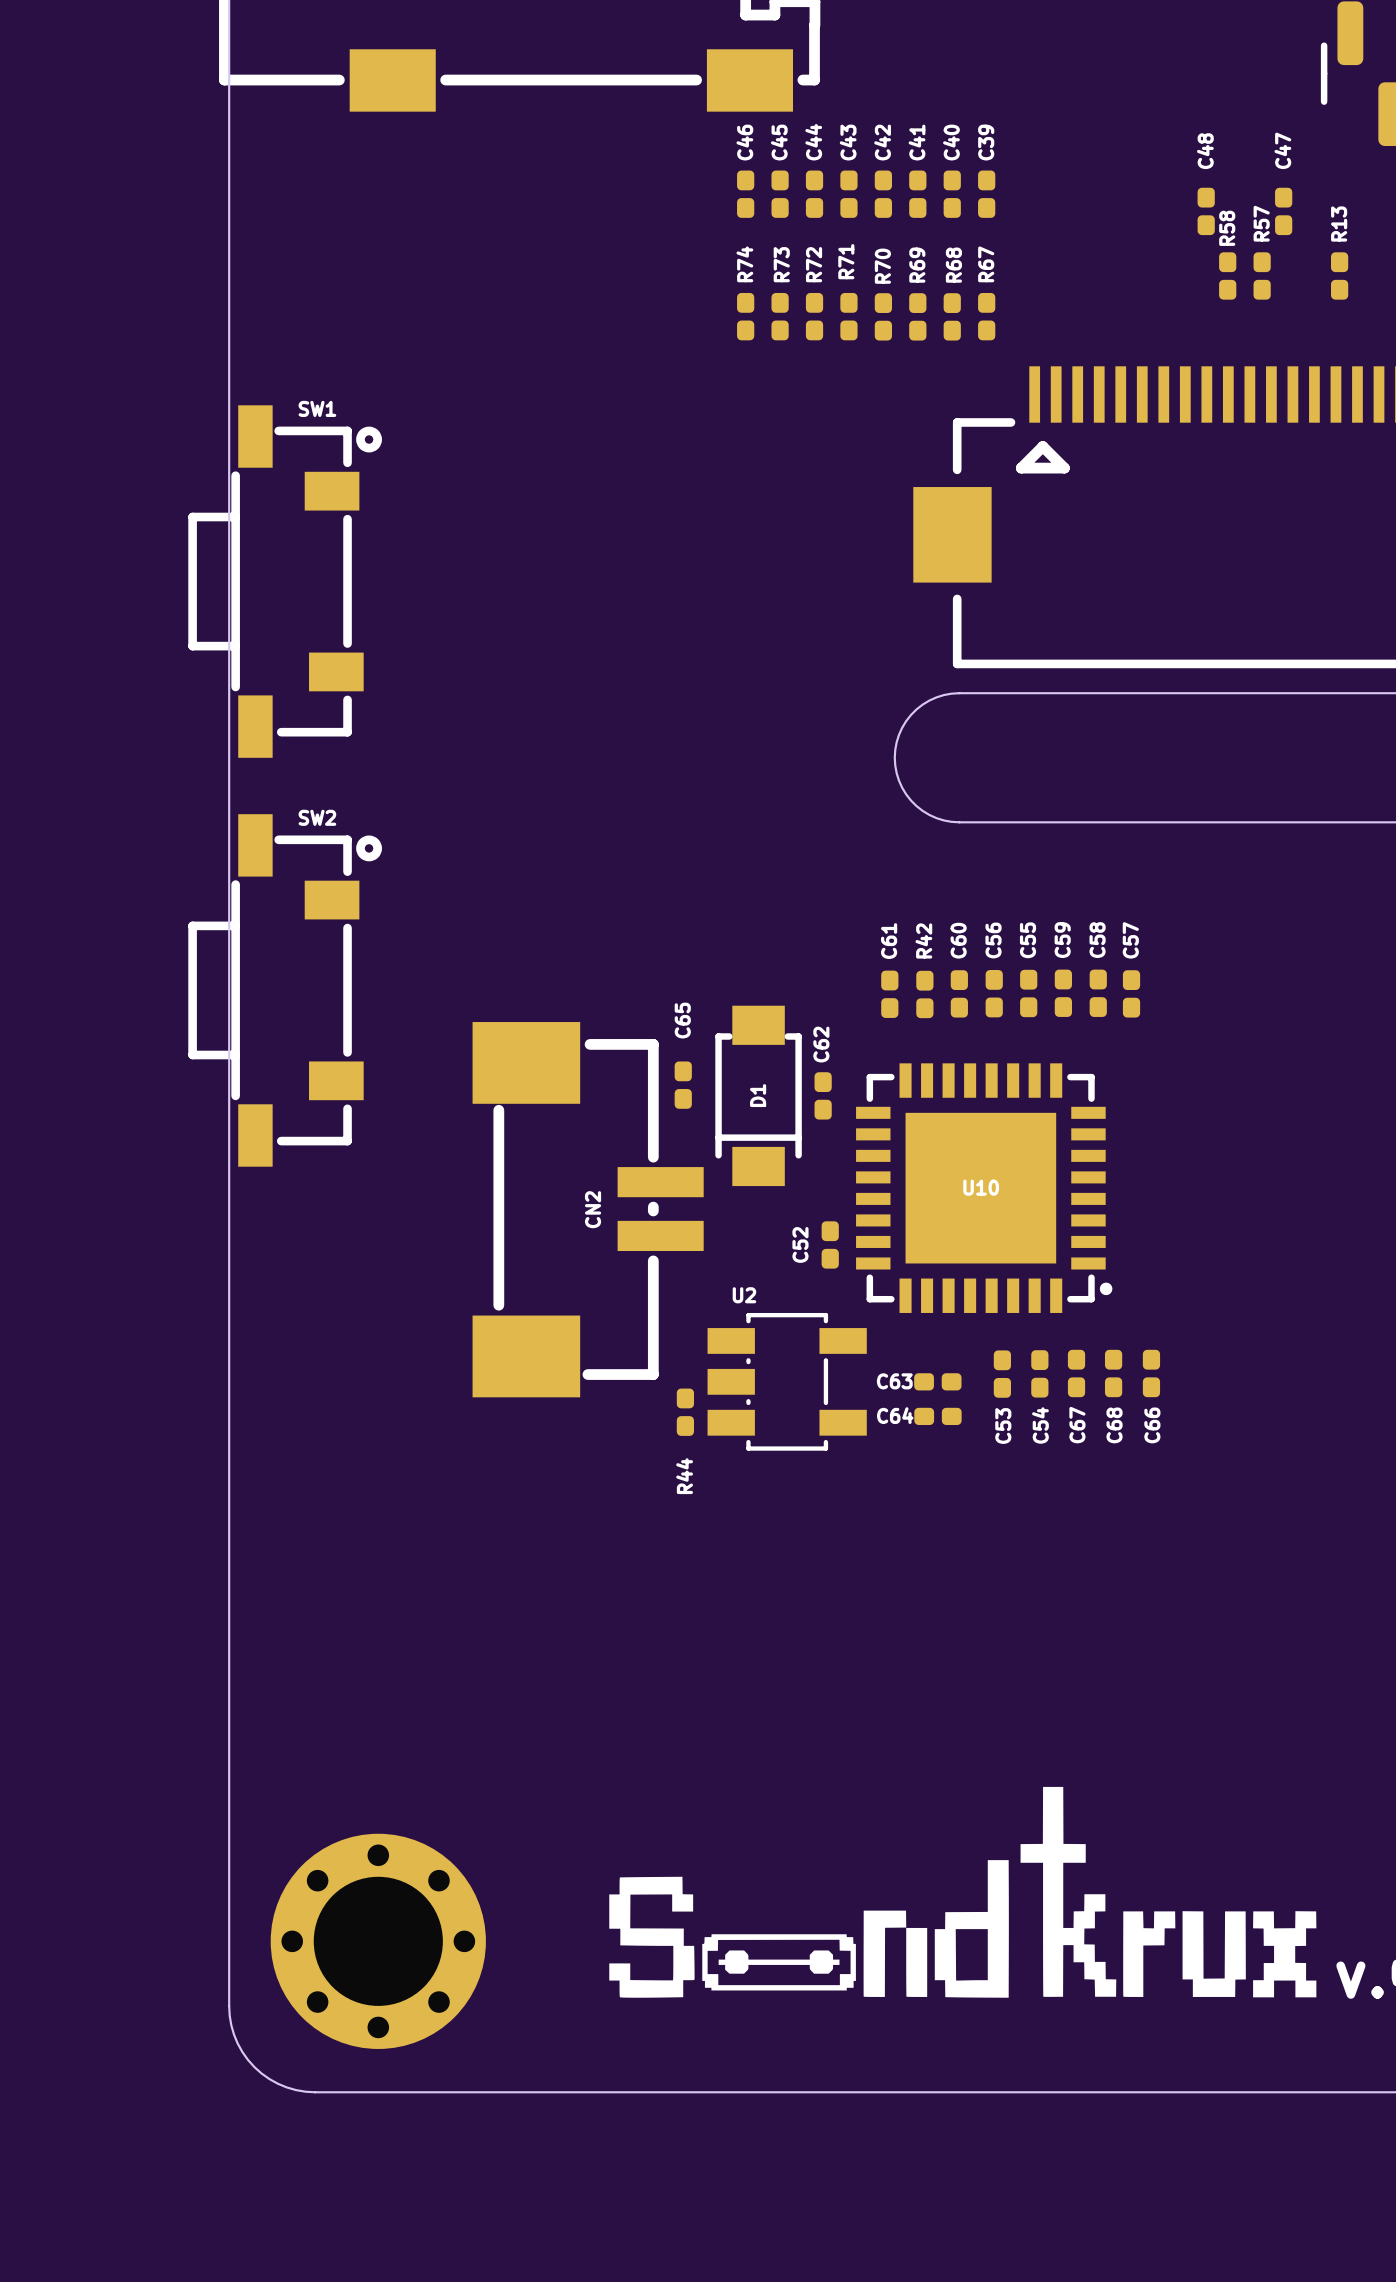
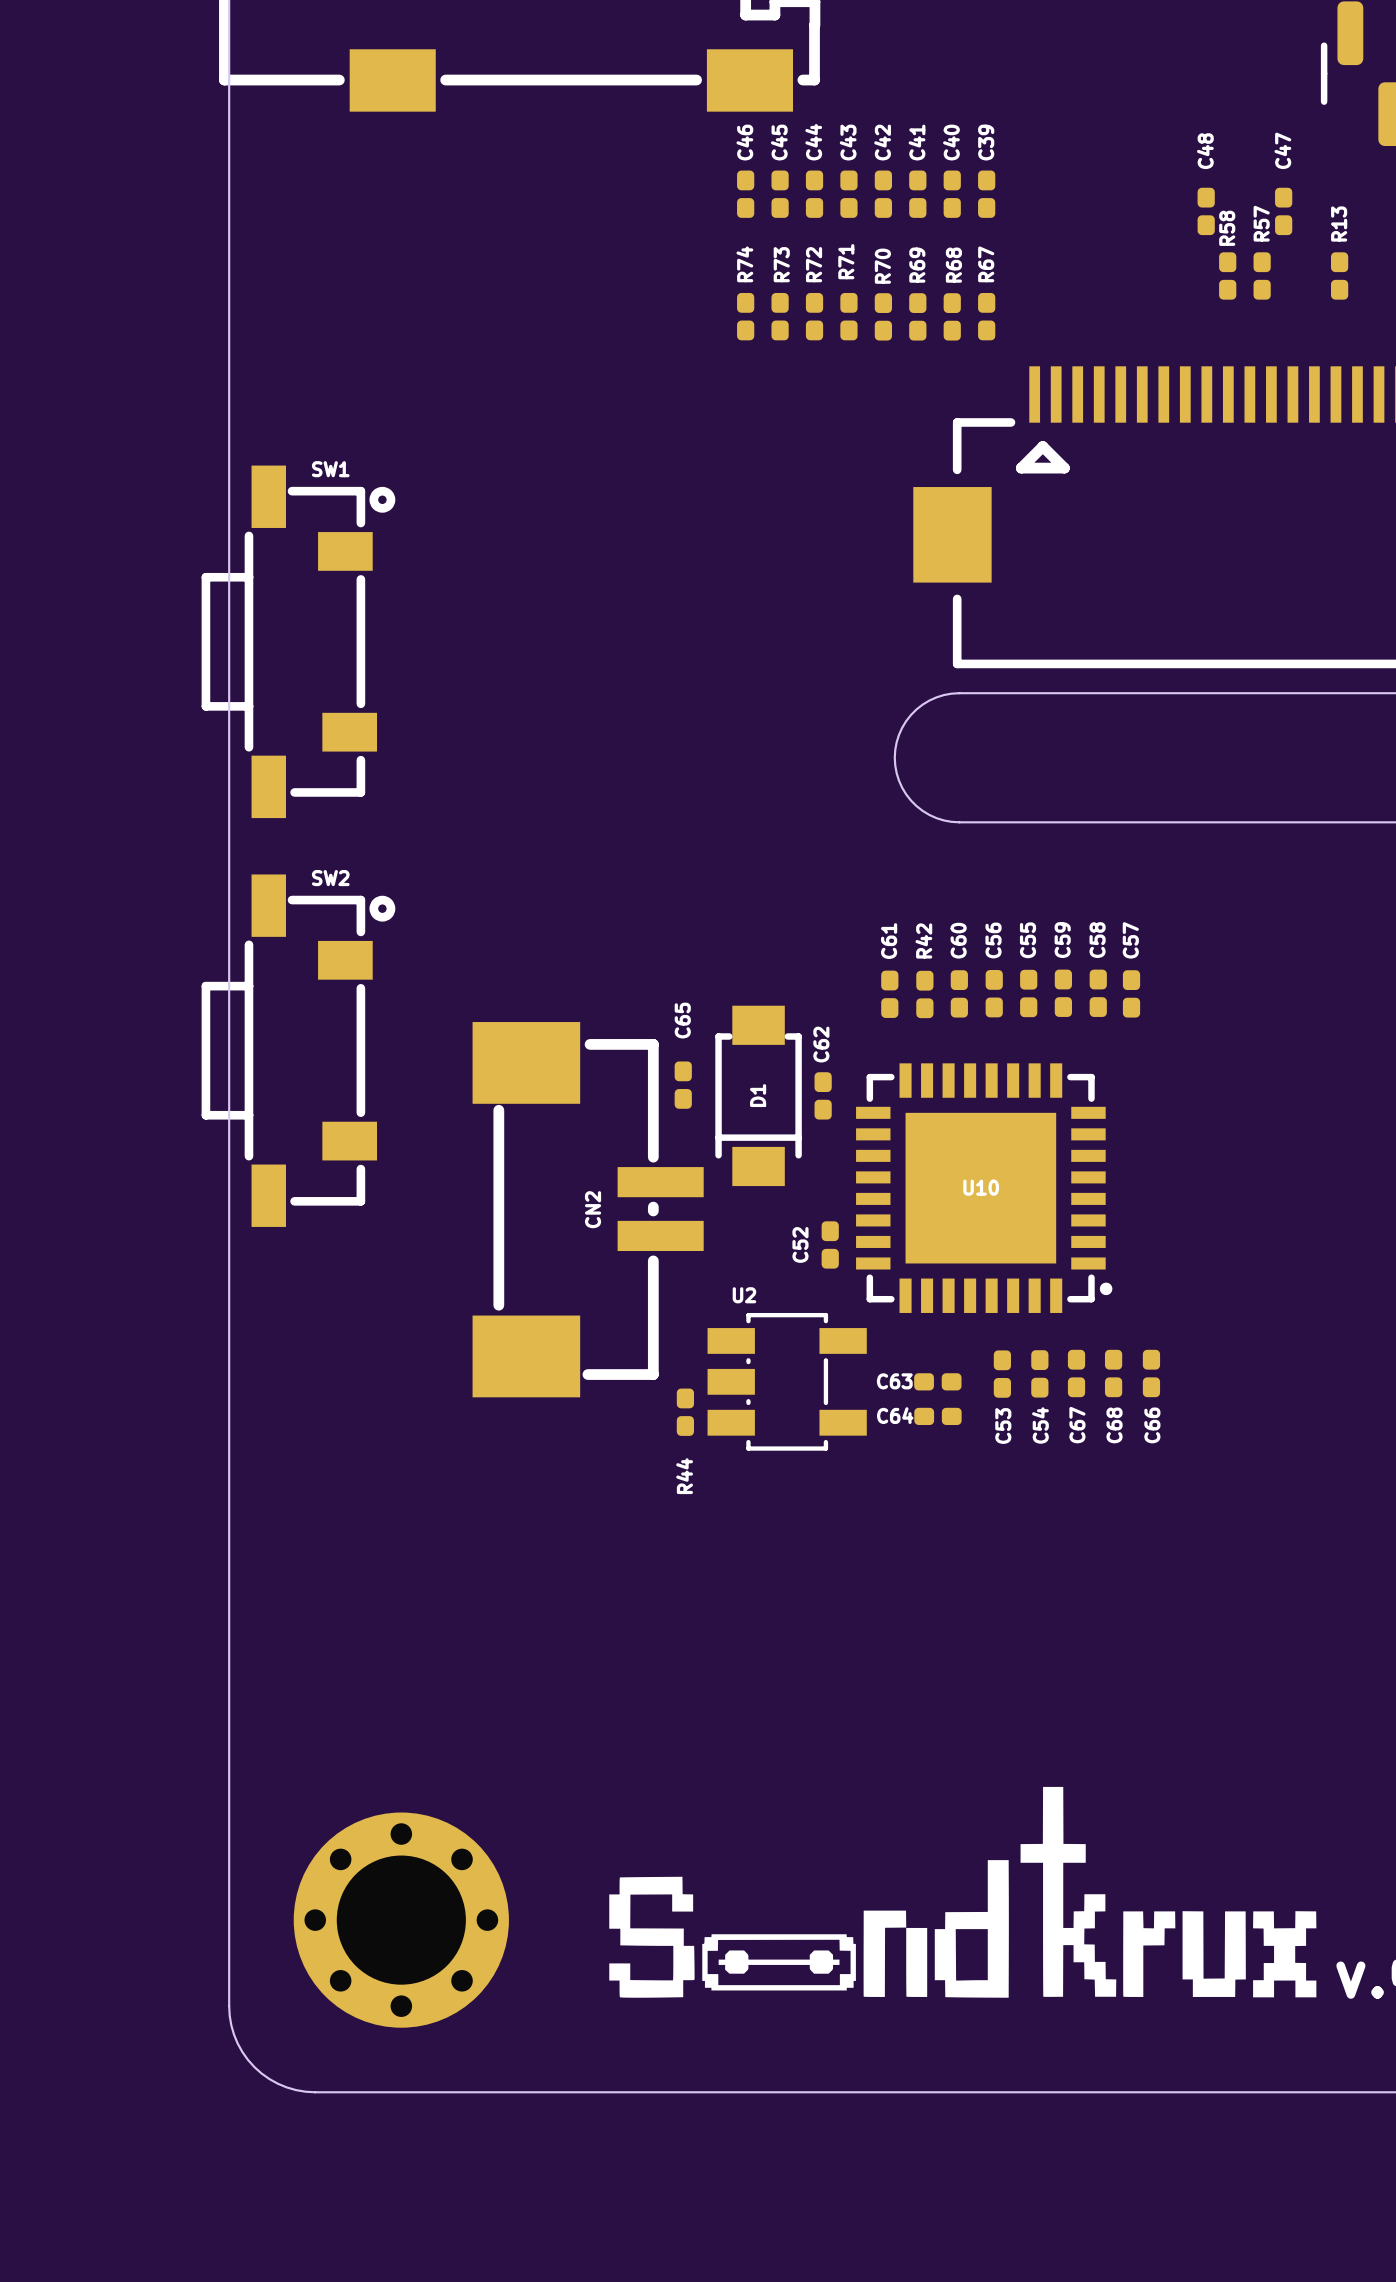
SW1 position: (285, 581) -> (298, 641)
SW2 position: (285, 990) -> (298, 1050)
part position: (378, 1941) -> (401, 1920)

